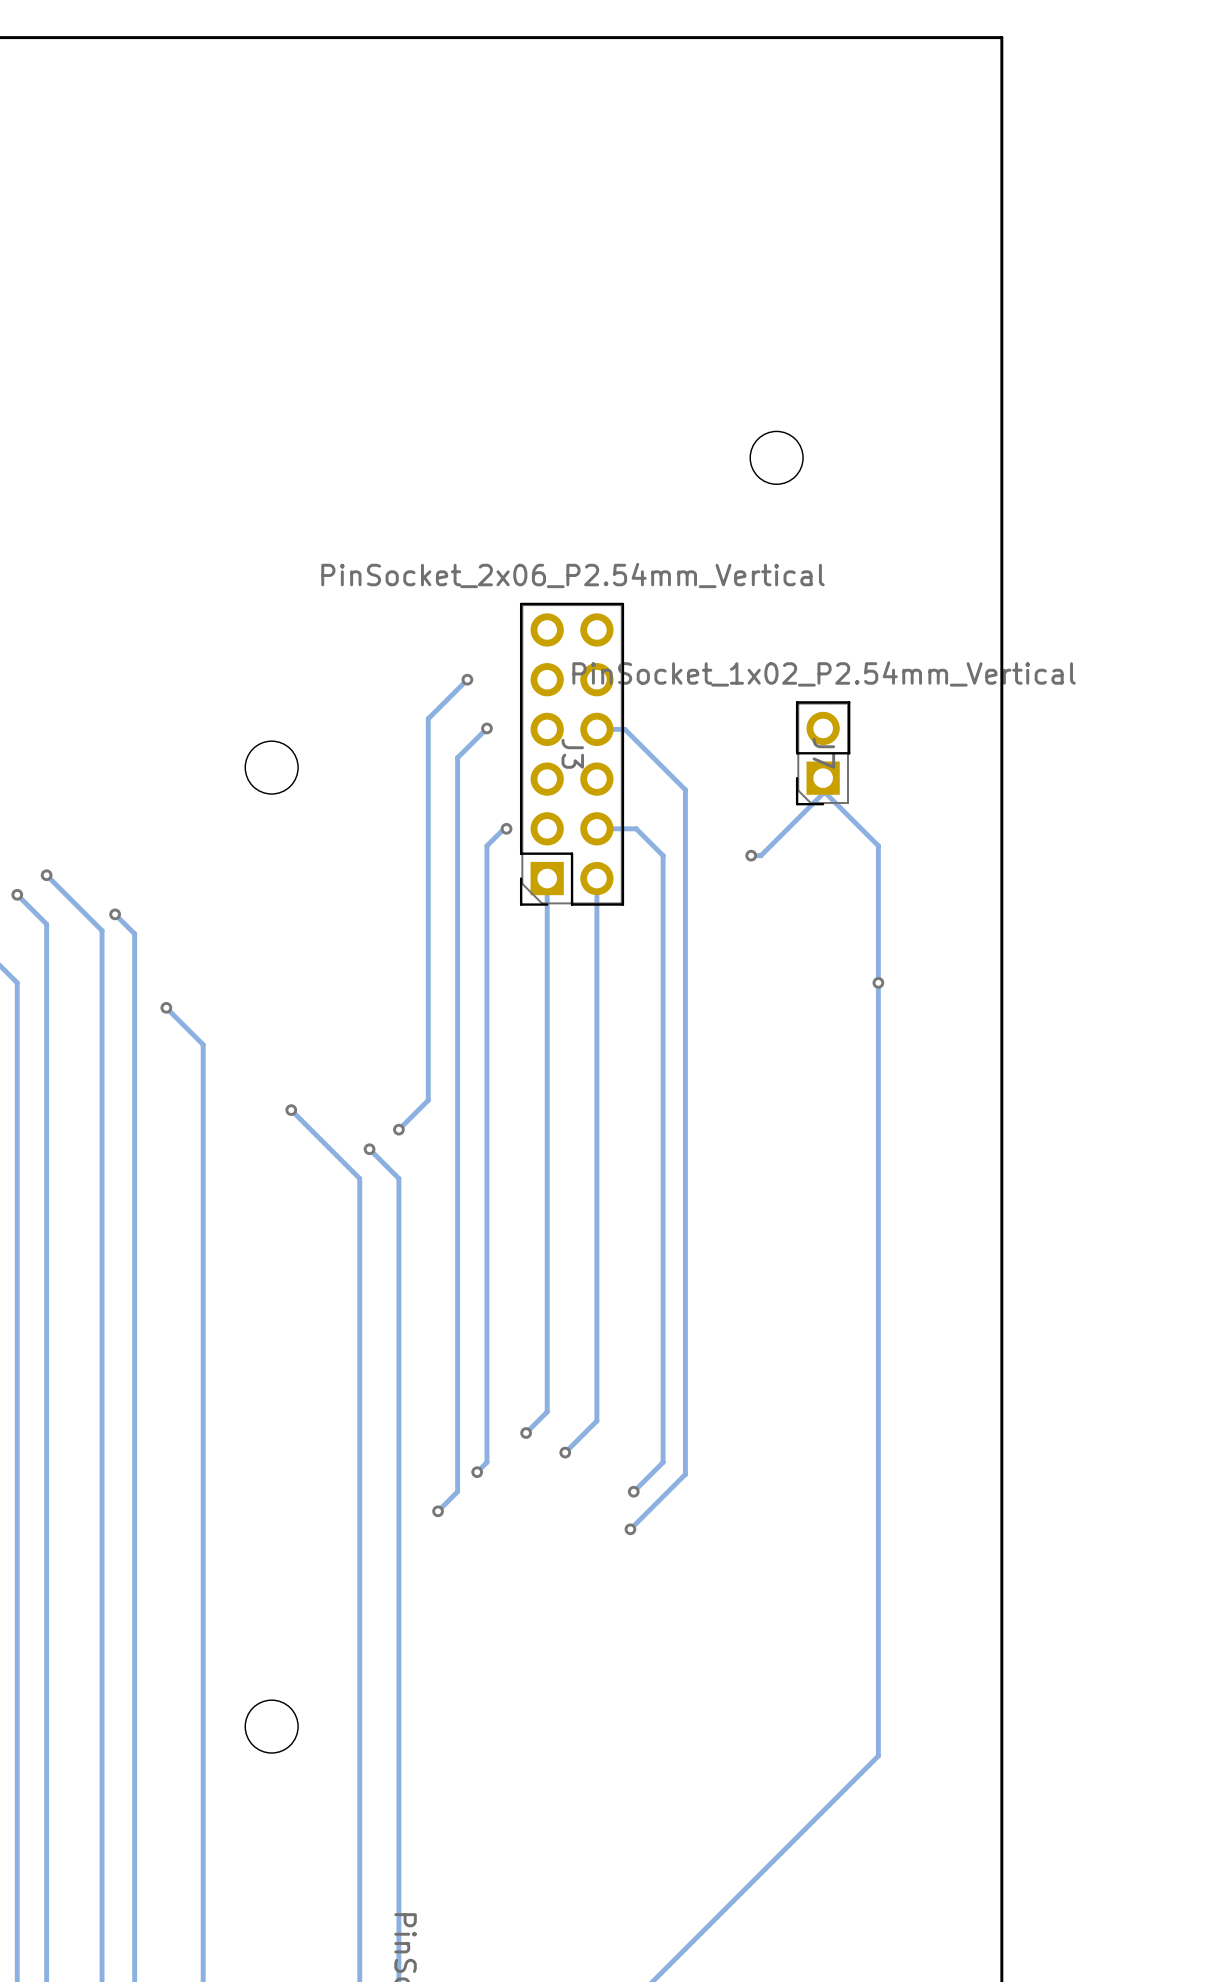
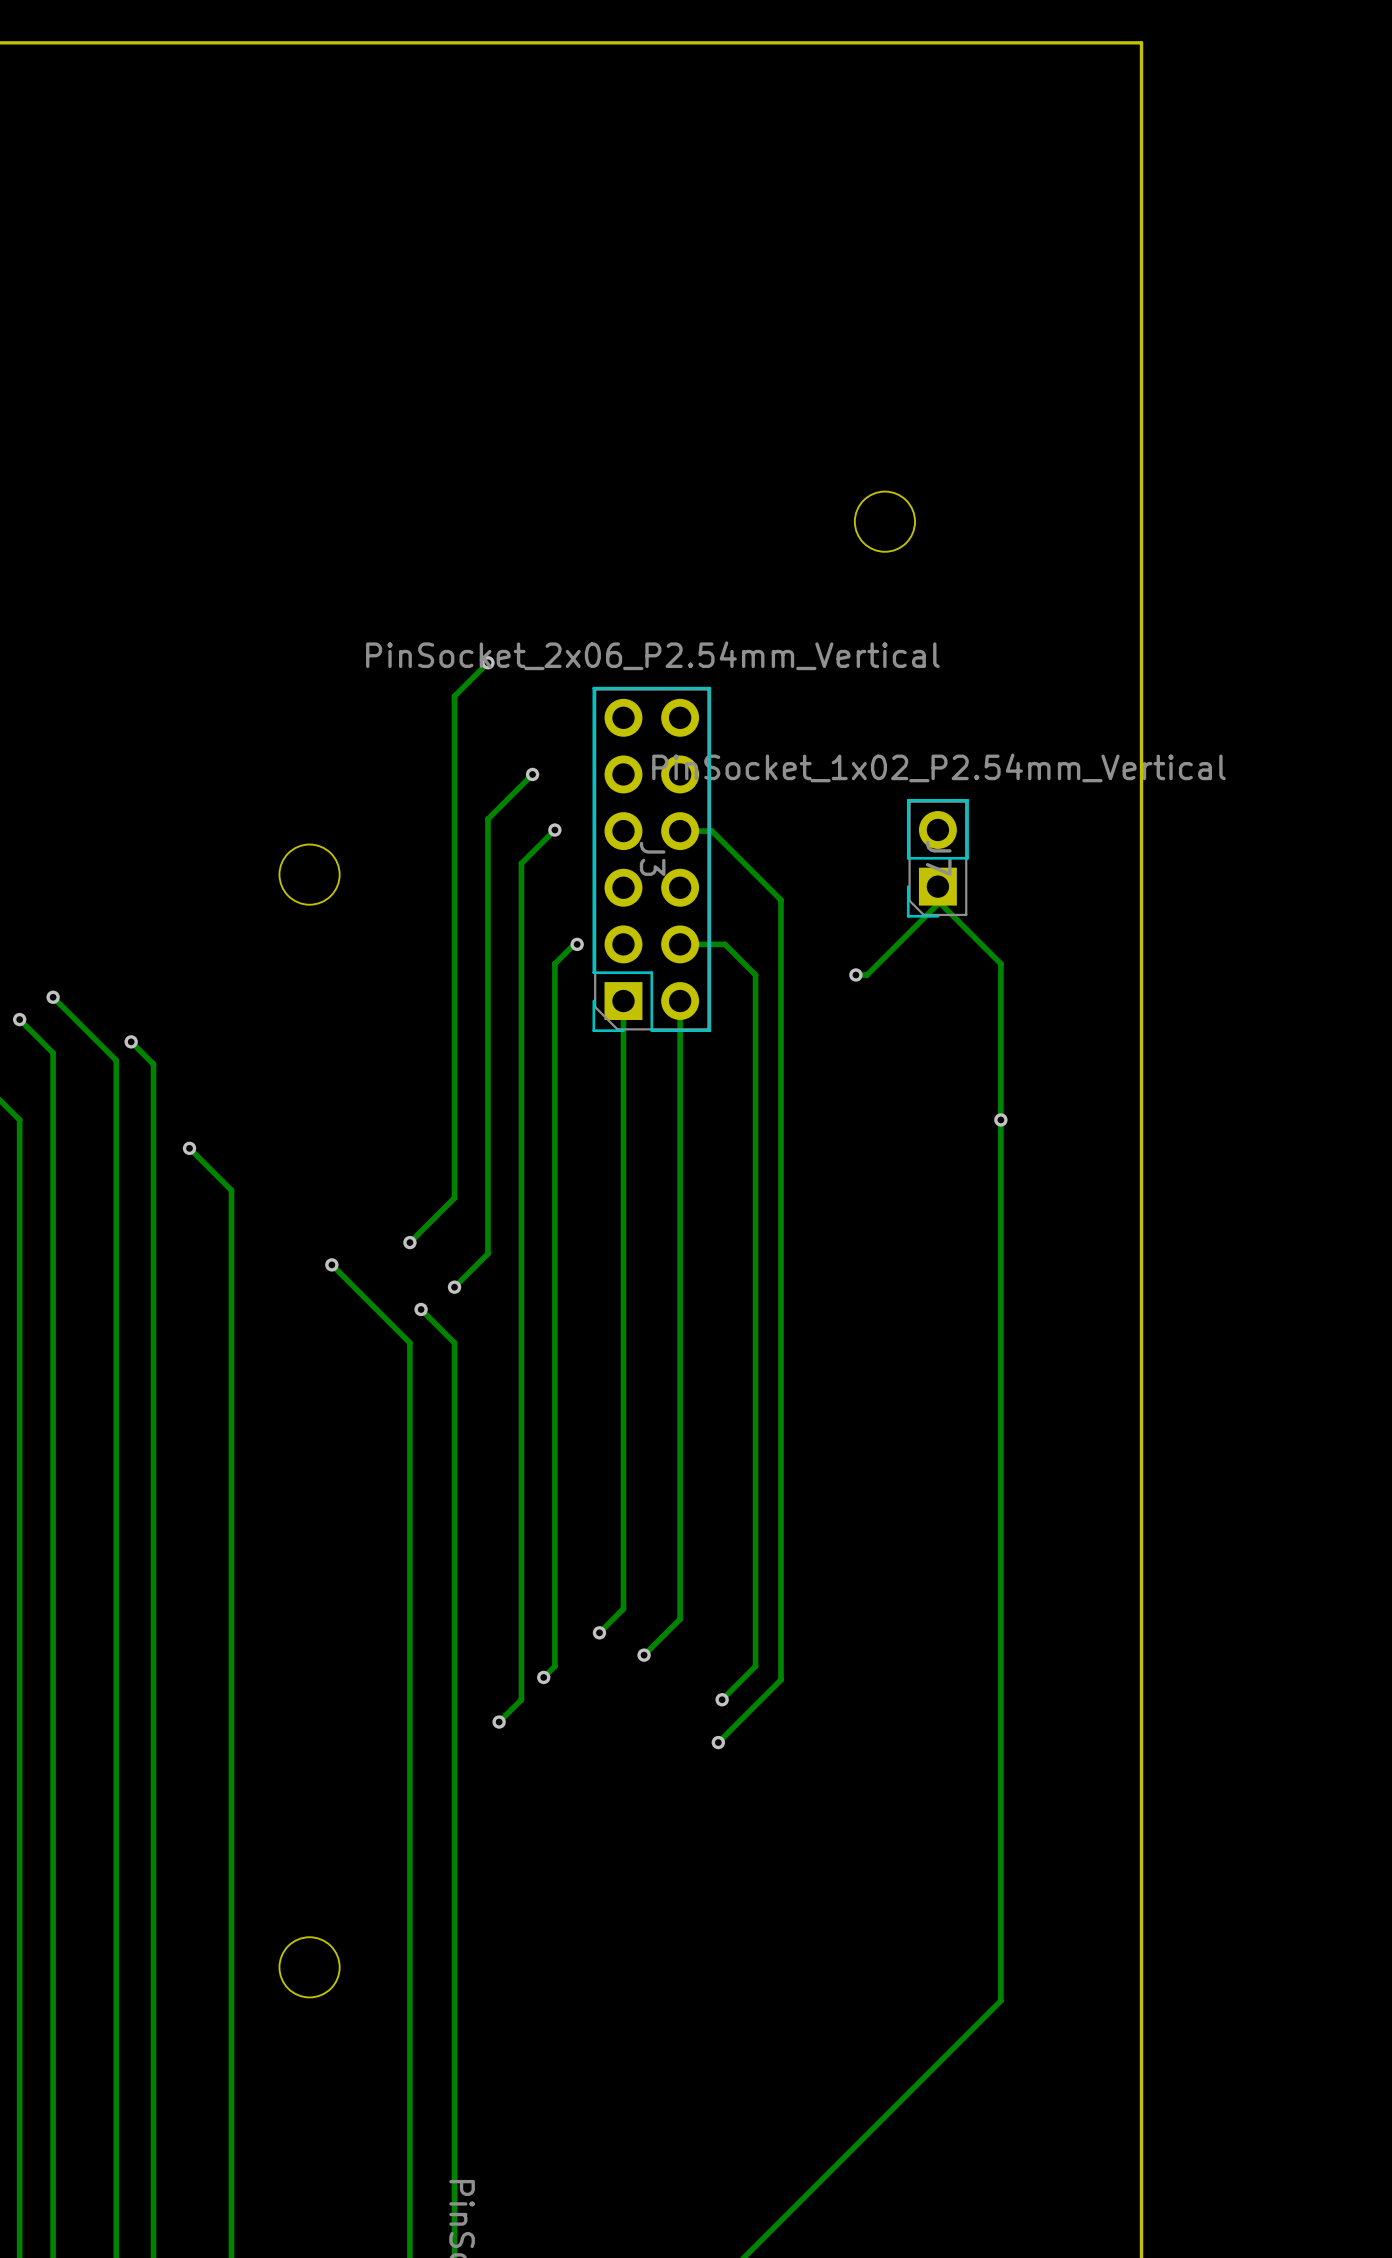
track: none -> (487, 662) (454, 696) (454, 1197) (409, 1242)
via: none -> (487, 662)
via: none -> (409, 1242)

